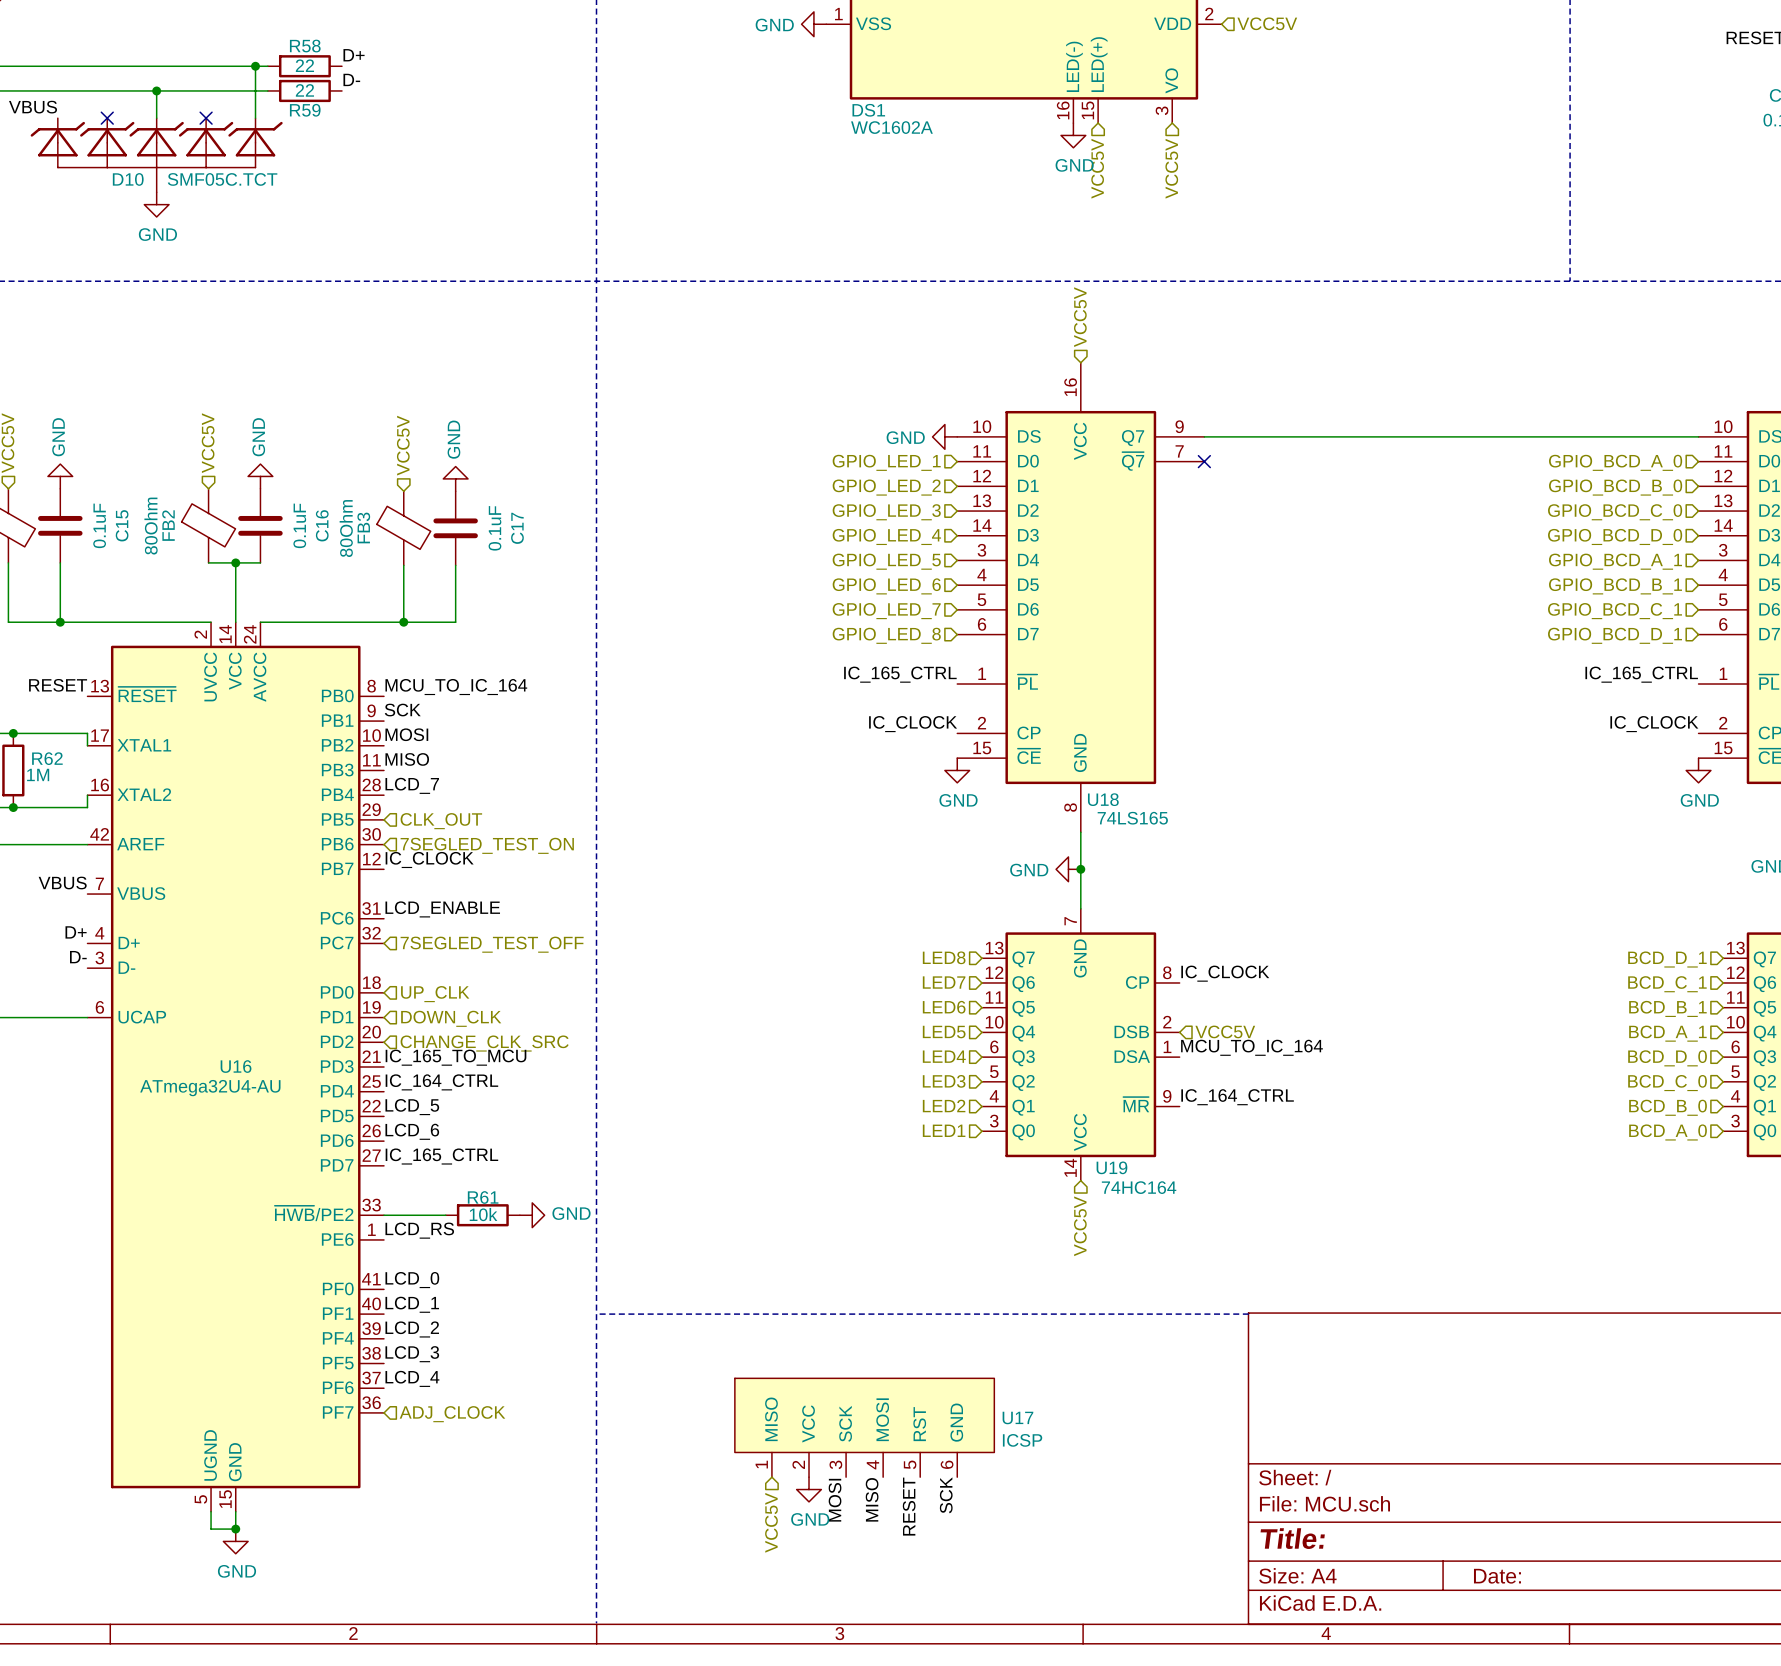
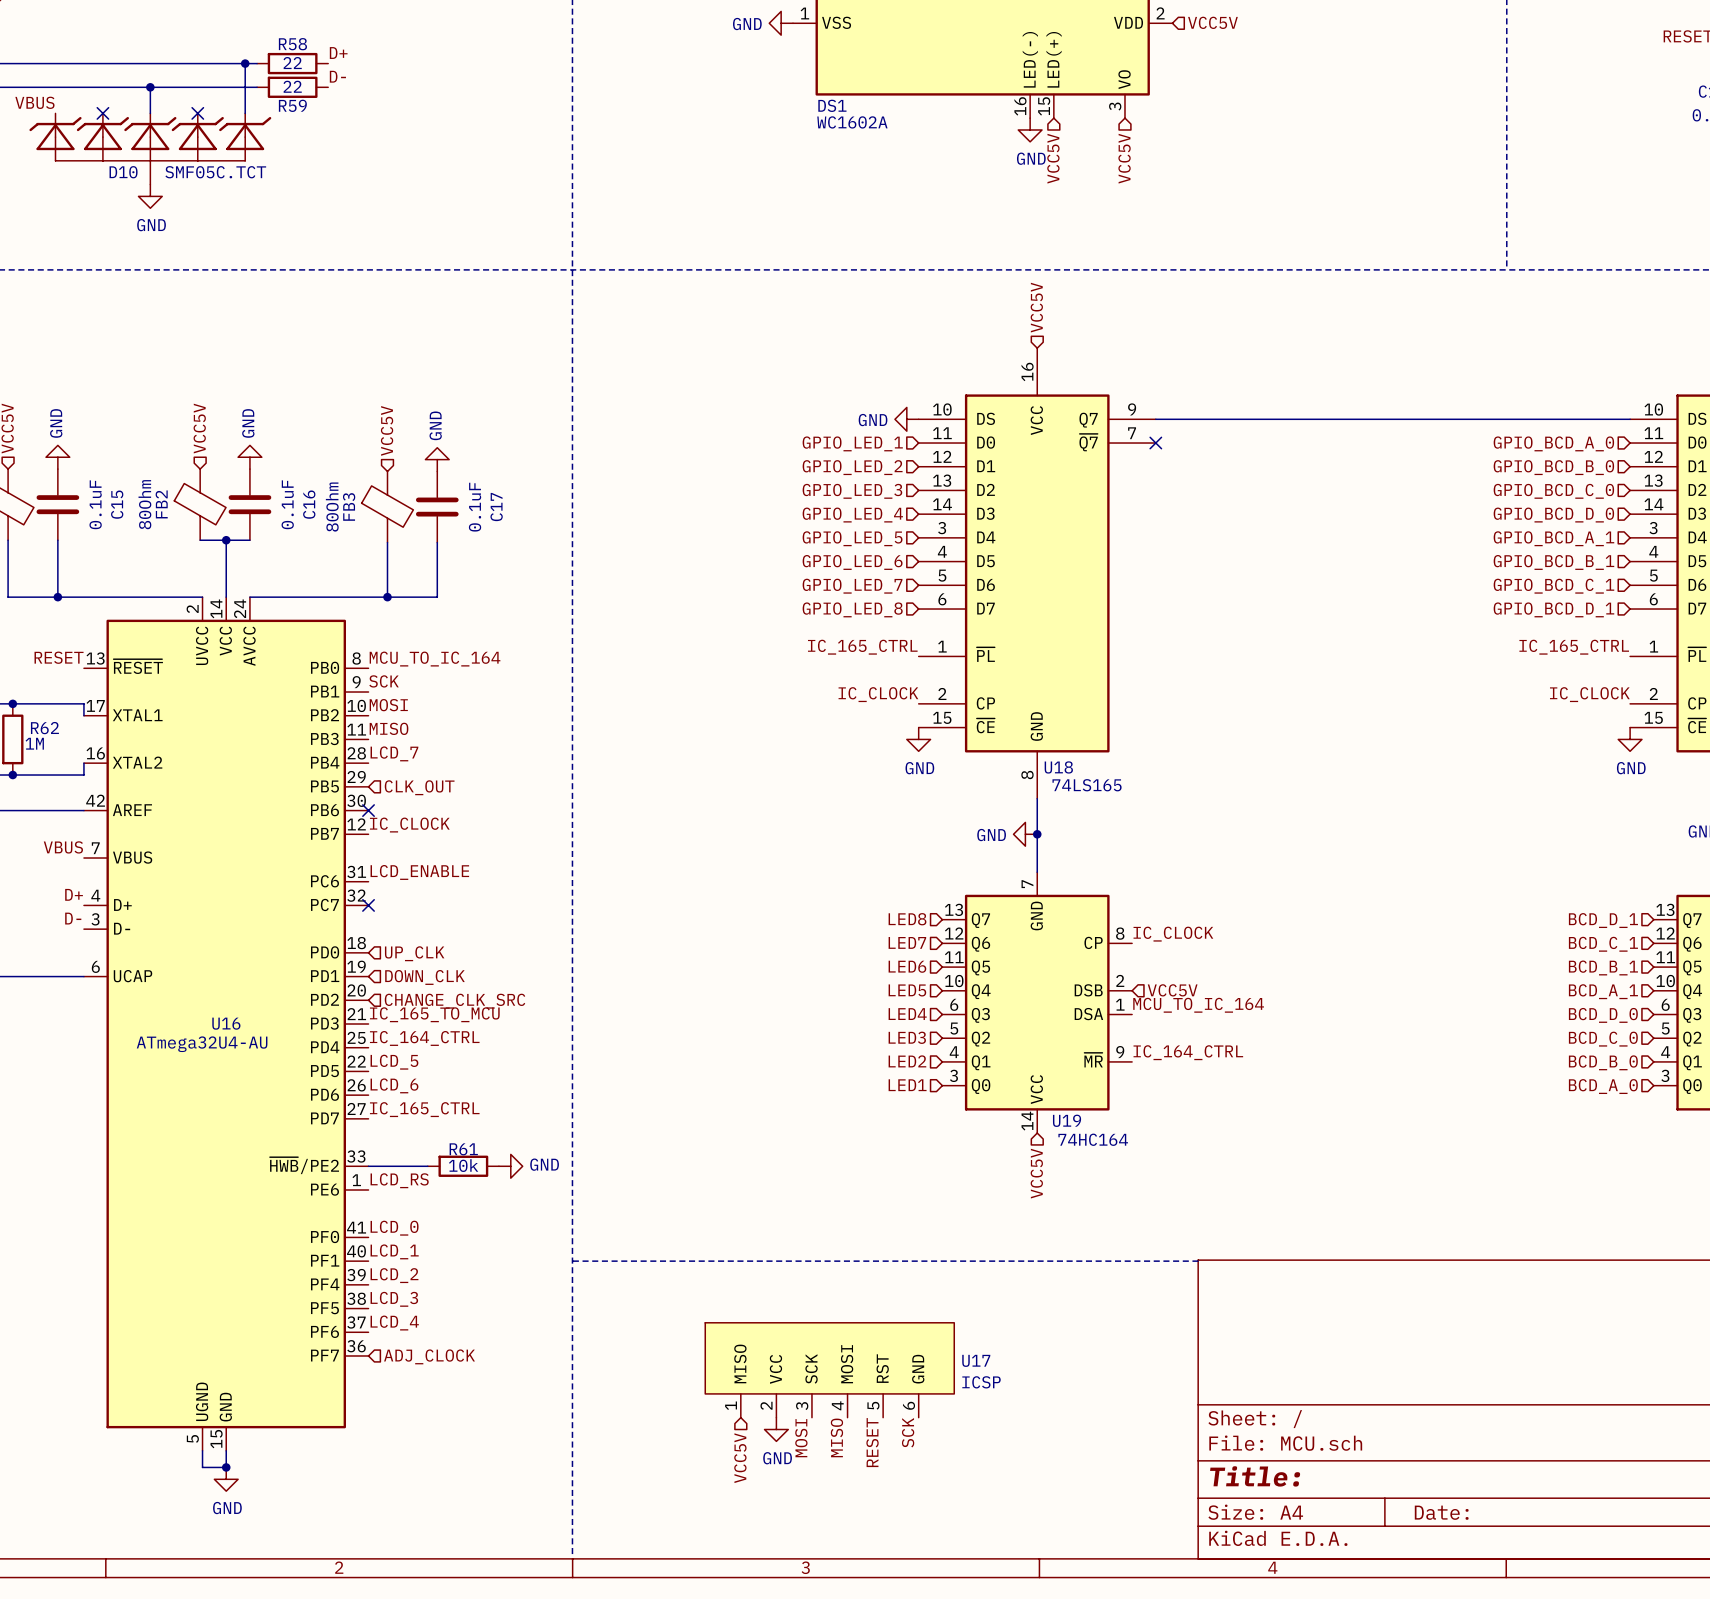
no-connect mark: none -> (368, 810)
hierarchical label: 7SEGLED_TEST_ON (487, 845) -> none
no-connect mark: none -> (368, 905)
hierarchical label: 7SEGLED_TEST_OFF (492, 944) -> none

